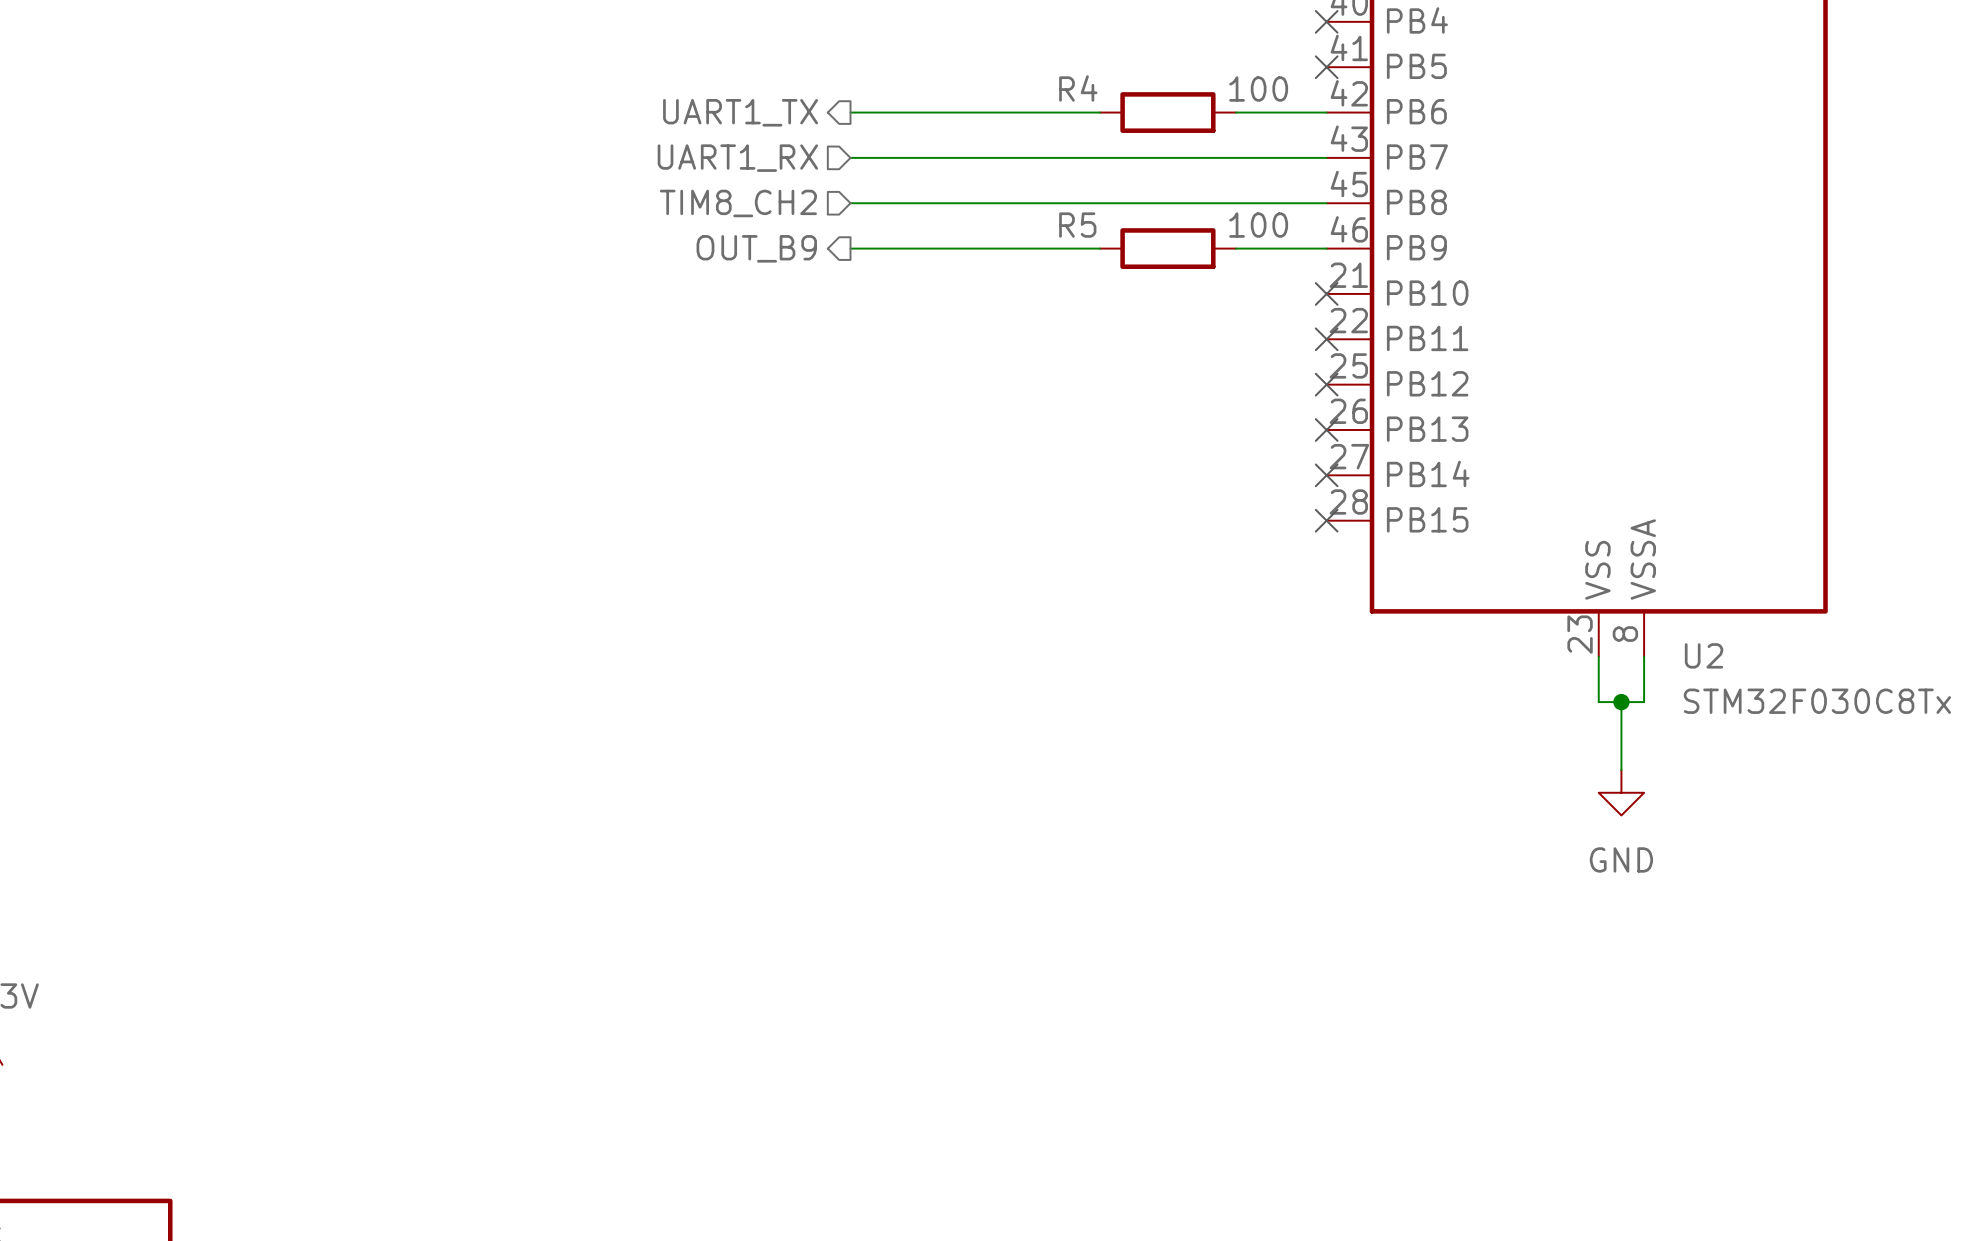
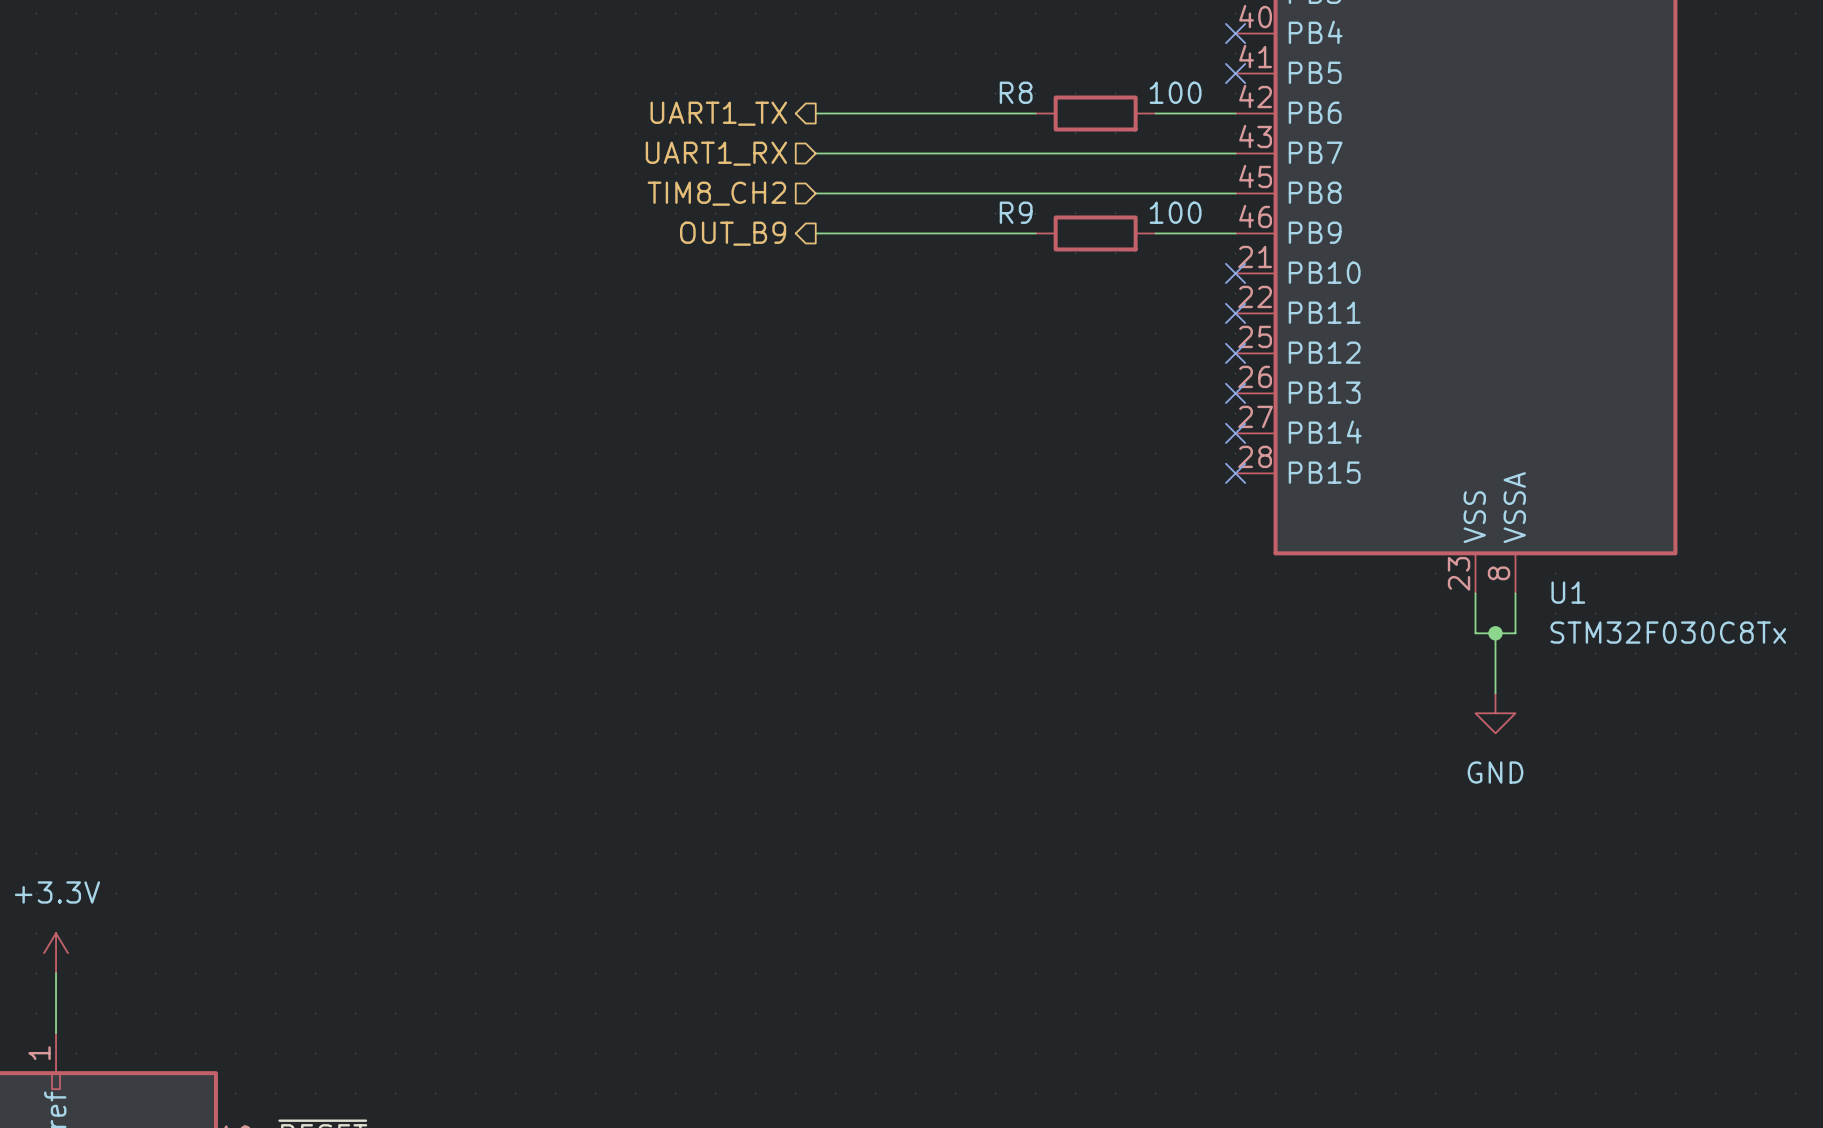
R4 name: R4 (1078, 88) -> R8 (1016, 92)
R5 name: R5 (1077, 225) -> R9 (1016, 212)
U2 name: U2 (1704, 655) -> U1 (1568, 592)

